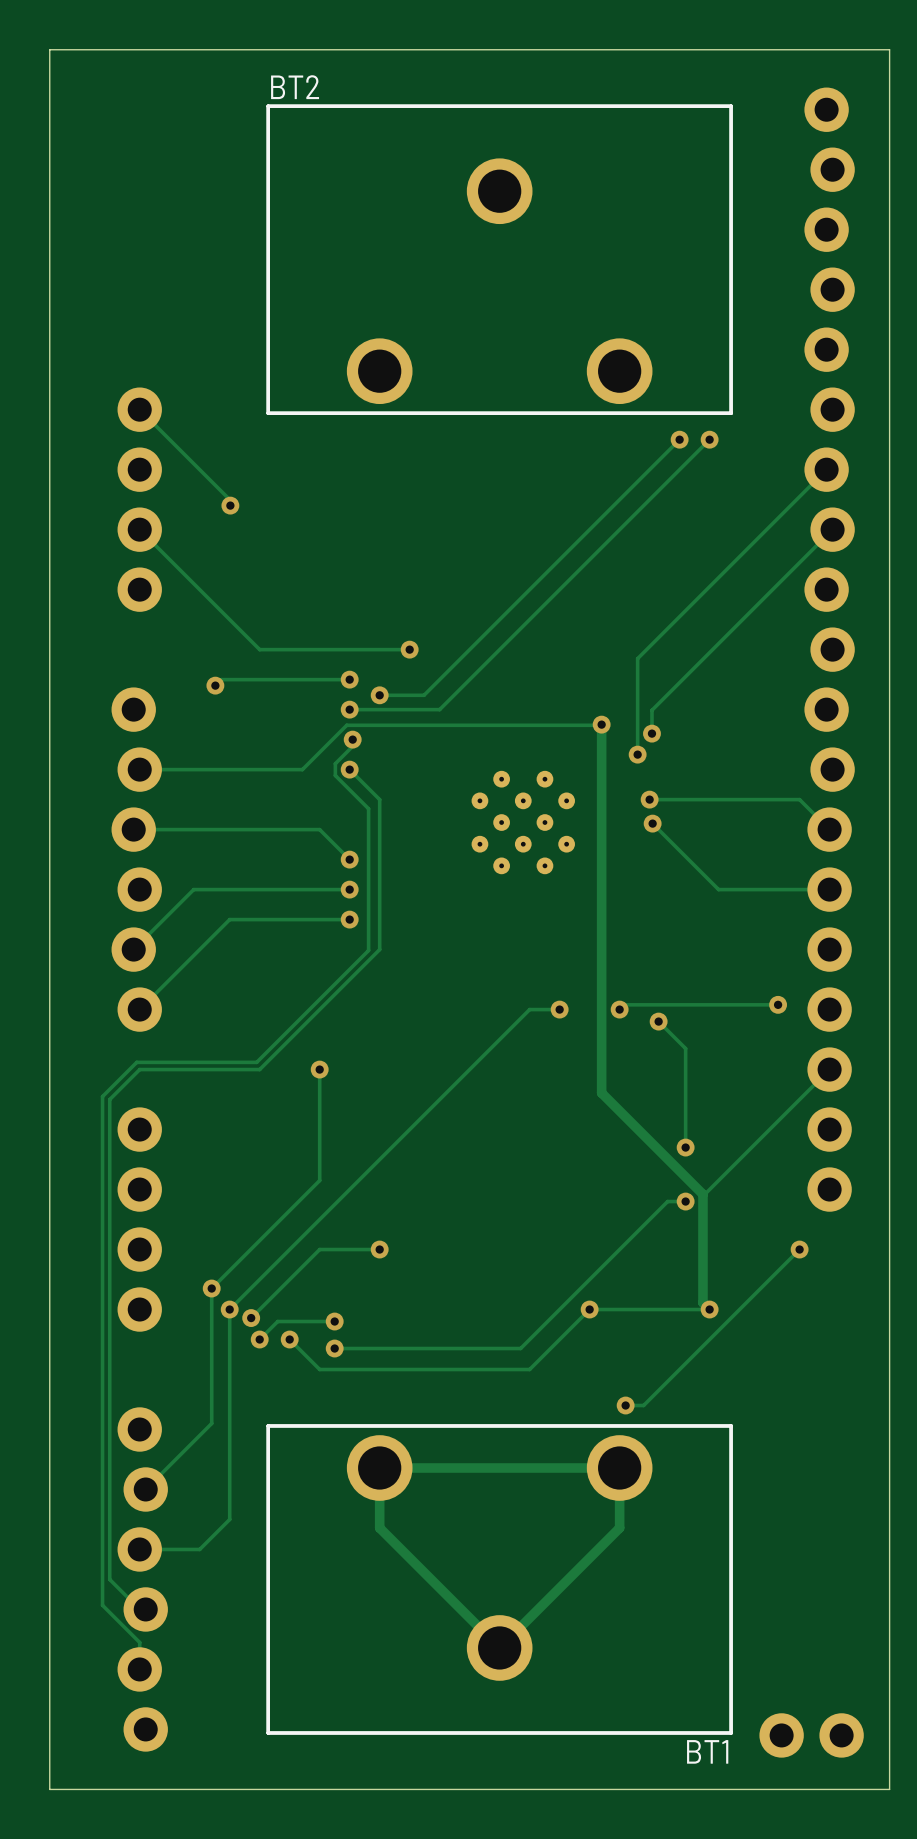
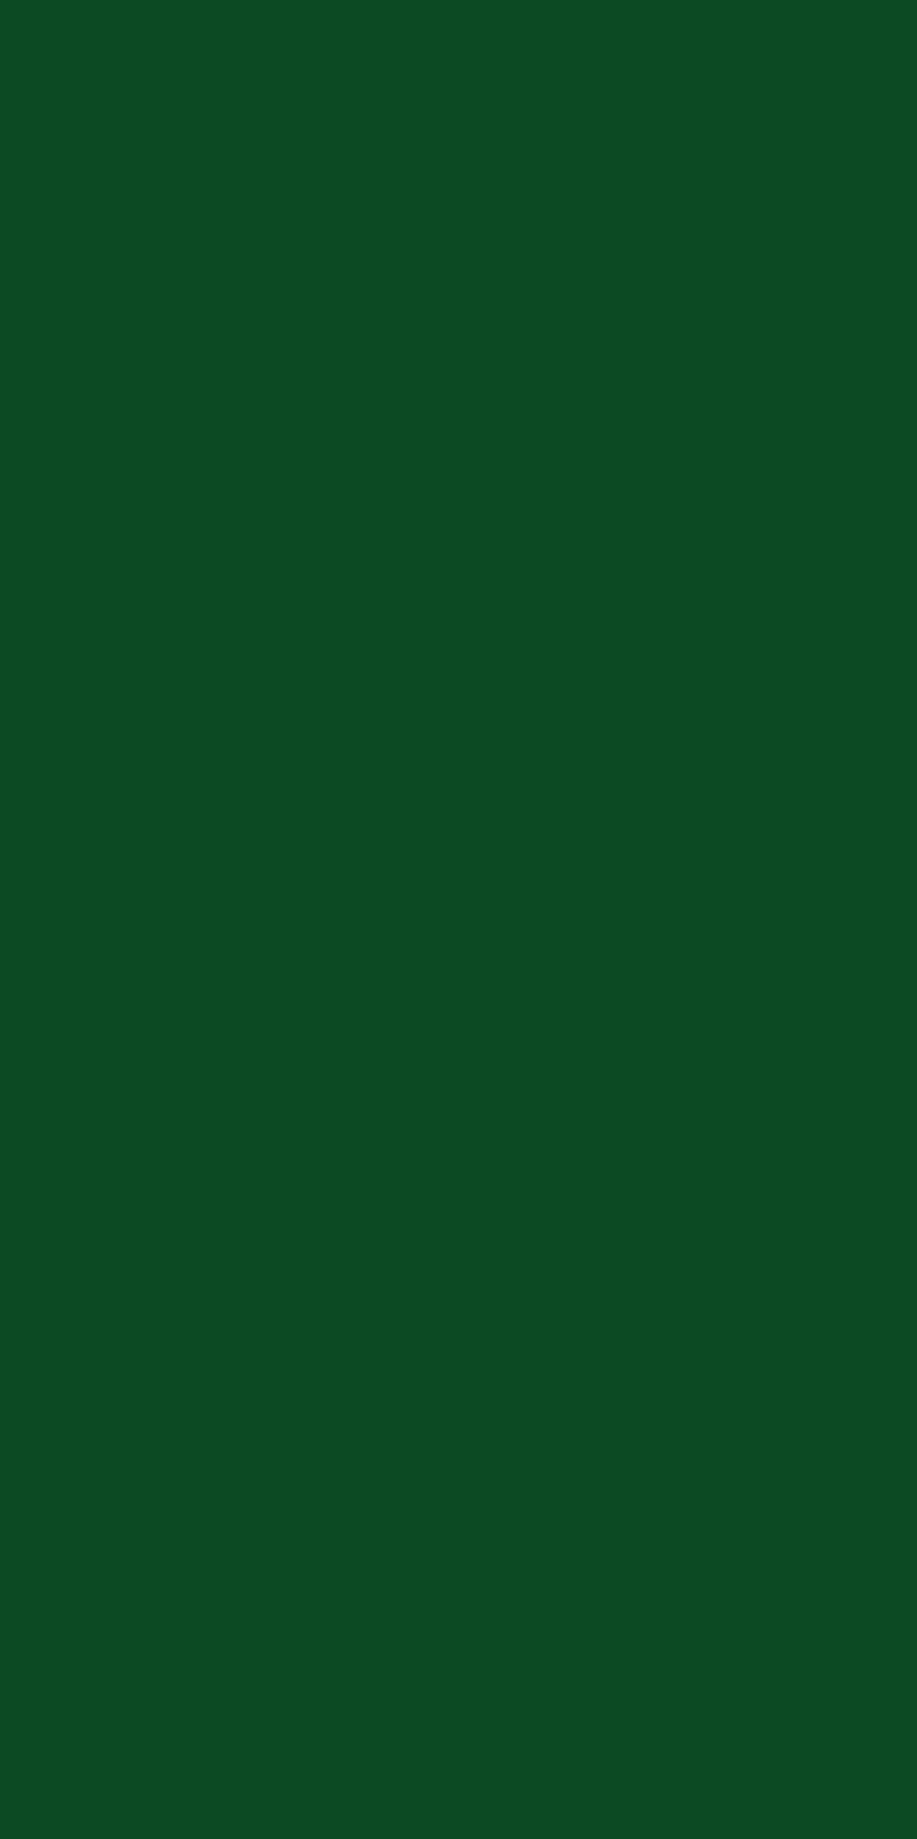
board edge: (889, 49) (49, 49) (49, 1789) (889, 1789) (889, 49) -> none
BT2: (499, 259) -> none
part: (829, 259) -> none
track: (139, 409) (230, 500) (230, 505) -> none
track: (679, 439) (424, 695) (379, 695) -> none
via: (679, 439) -> none
track: (709, 439) (439, 709) (349, 709) -> none
via: (709, 439) -> none
track: (826, 469) (637, 658) (637, 754) -> none
part: (139, 499) -> none
via: (230, 505) -> none
track: (139, 529) (259, 649) (409, 649) -> none
track: (832, 529) (651, 710) (651, 733) -> none
part: (829, 619) -> none
via: (409, 649) -> none
track: (349, 679) (221, 679) (215, 685) -> none
via: (349, 679) -> none
via: (215, 685) -> none
via: (379, 695) -> none
via: (349, 709) -> none
via: (601, 724) -> none
via: (651, 733) -> none
track: (352, 739) (352, 746) (335, 763) (335, 775) (368, 808) (368, 950) (256, 1062) (136, 1062) (102, 1096) (102, 1605) (139, 1642) (139, 1669) -> none
via: (352, 739) -> none
via: (637, 754) -> none
track: (139, 769) (302, 769) (346, 725) (601, 724) (601, 1093) (702, 1194) -> none
track: (349, 769) (379, 799) (379, 949) (259, 1069) (139, 1069) (109, 1099) (109, 1579) (139, 1609) (145, 1609) -> none
via: (349, 769) -> none
track: (649, 799) (799, 799) (829, 829) -> none
via: (649, 799) -> none
part: (523, 822) -> none
track: (652, 823) (718, 889) (829, 889) -> none
via: (652, 823) -> none
track: (133, 829) (319, 829) (349, 859) -> none
part: (136, 859) -> none
via: (349, 859) -> none
track: (349, 889) (193, 889) (133, 949) -> none
via: (349, 889) -> none
track: (349, 919) (229, 919) (139, 1009) -> none
via: (349, 919) -> none
part: (829, 949) -> none
track: (778, 1004) (624, 1004) (619, 1009) -> none
via: (778, 1004) -> none
track: (559, 1009) (529, 1009) (229, 1309) (229, 1519) (199, 1549) (139, 1549) -> none
via: (559, 1009) -> none
via: (619, 1009) -> none
track: (658, 1021) (685, 1048) (685, 1147) -> none
via: (658, 1021) -> none
track: (319, 1069) (319, 1180) (211, 1288) (211, 1423) (145, 1489) -> none
via: (319, 1069) -> none
track: (829, 1069) (702, 1194) -> none
via: (685, 1147) -> none
part: (829, 1159) -> none
track: (702, 1194) (702, 1302) (709, 1309) (589, 1309) (529, 1369) (319, 1369) (289, 1339) -> none
track: (685, 1201) (667, 1201) (520, 1348) (334, 1348) -> none
via: (685, 1201) -> none
part: (139, 1219) -> none
track: (379, 1249) (319, 1249) (251, 1318) -> none
via: (379, 1249) -> none
track: (799, 1249) (643, 1405) (625, 1405) -> none
via: (799, 1249) -> none
via: (211, 1288) -> none
via: (229, 1309) -> none
via: (589, 1309) -> none
via: (709, 1309) -> none
via: (251, 1318) -> none
track: (334, 1321) (277, 1321) (259, 1339) -> none
via: (334, 1321) -> none
via: (259, 1339) -> none
via: (289, 1339) -> none
via: (334, 1348) -> none
via: (625, 1405) -> none
track: (619, 1468) (619, 1527) (499, 1647) (379, 1527) (379, 1468) (619, 1468) -> none
part: (142, 1579) -> none
BT1: (499, 1579) -> none
part: (811, 1735) -> none

